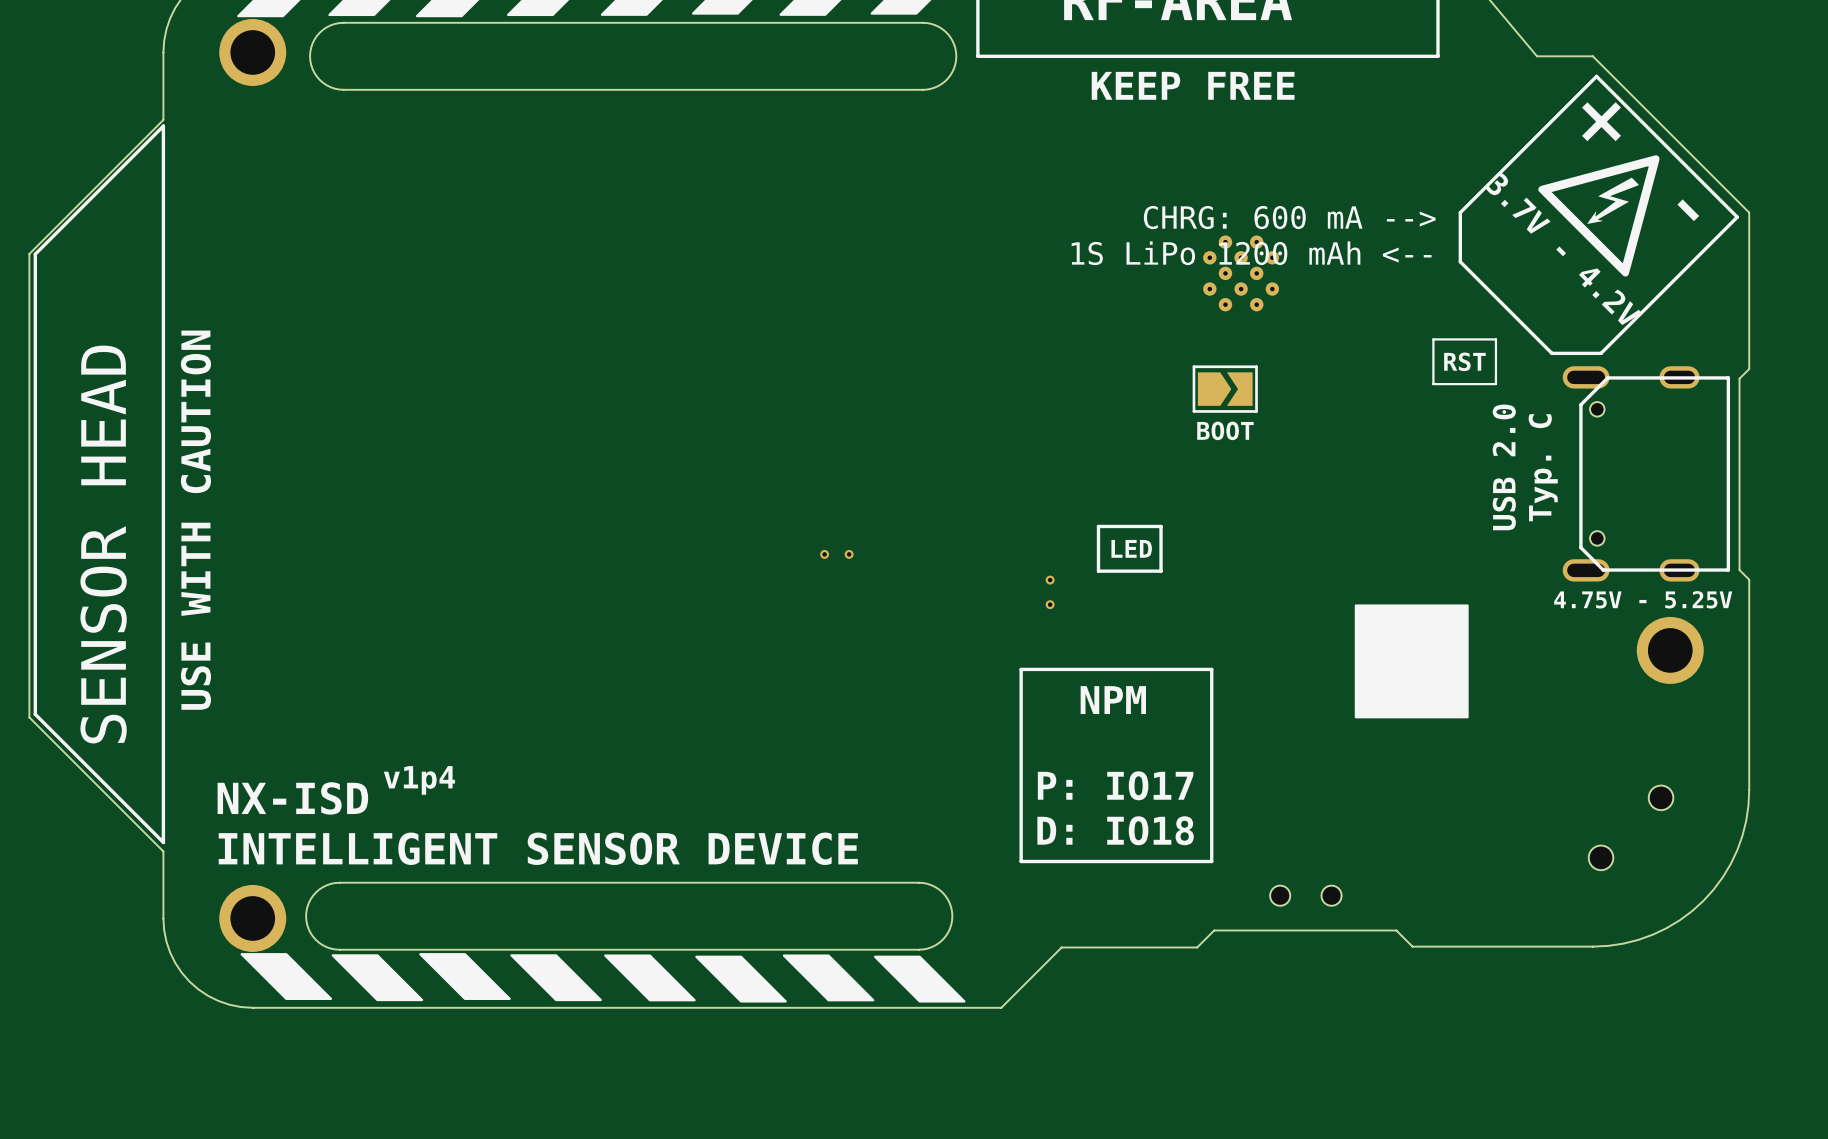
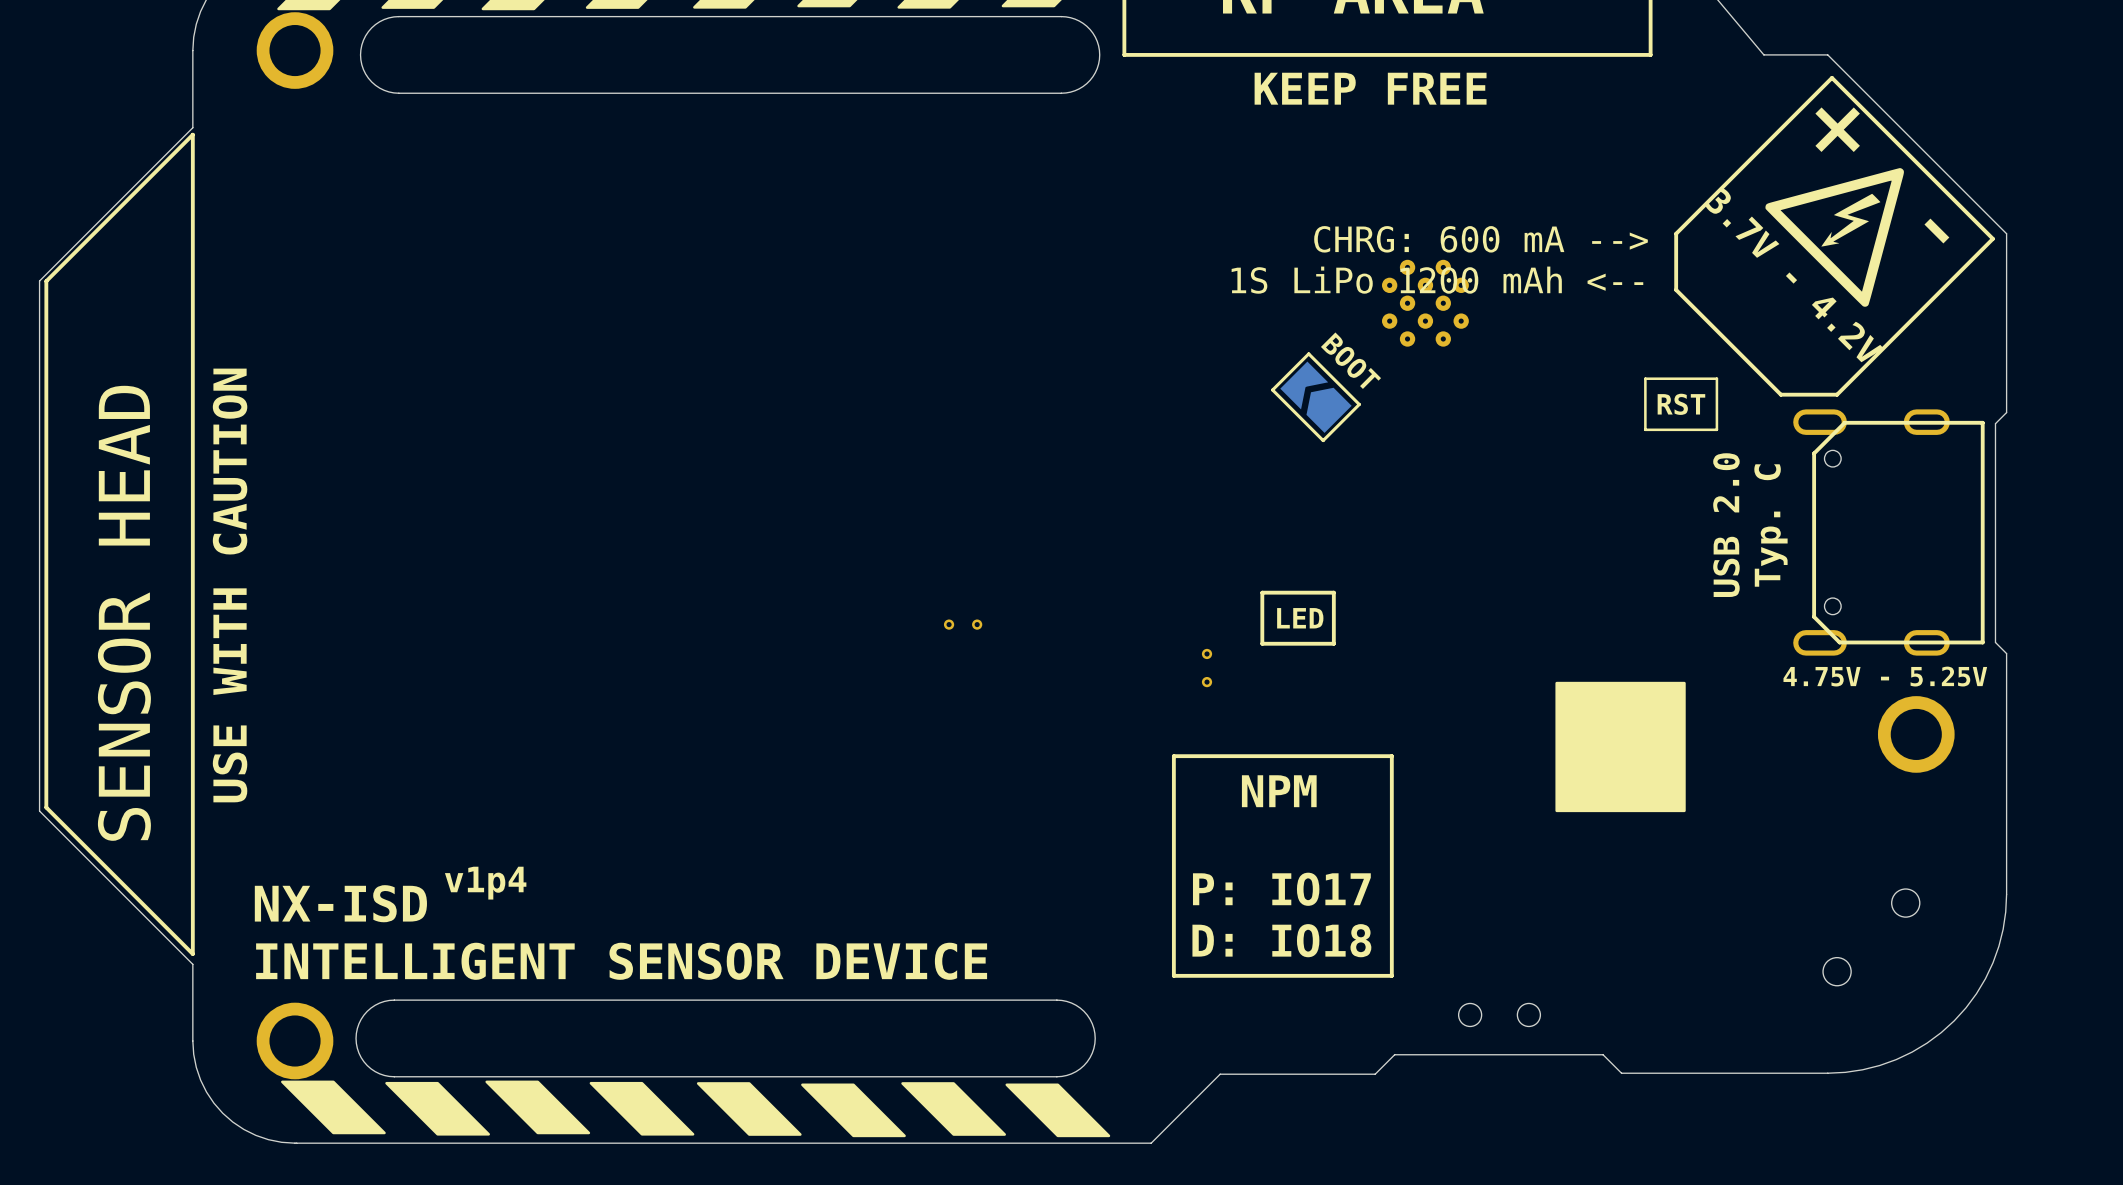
part: none -> BOOT (1315, 397)
part: BOOT (1225, 389) -> none

